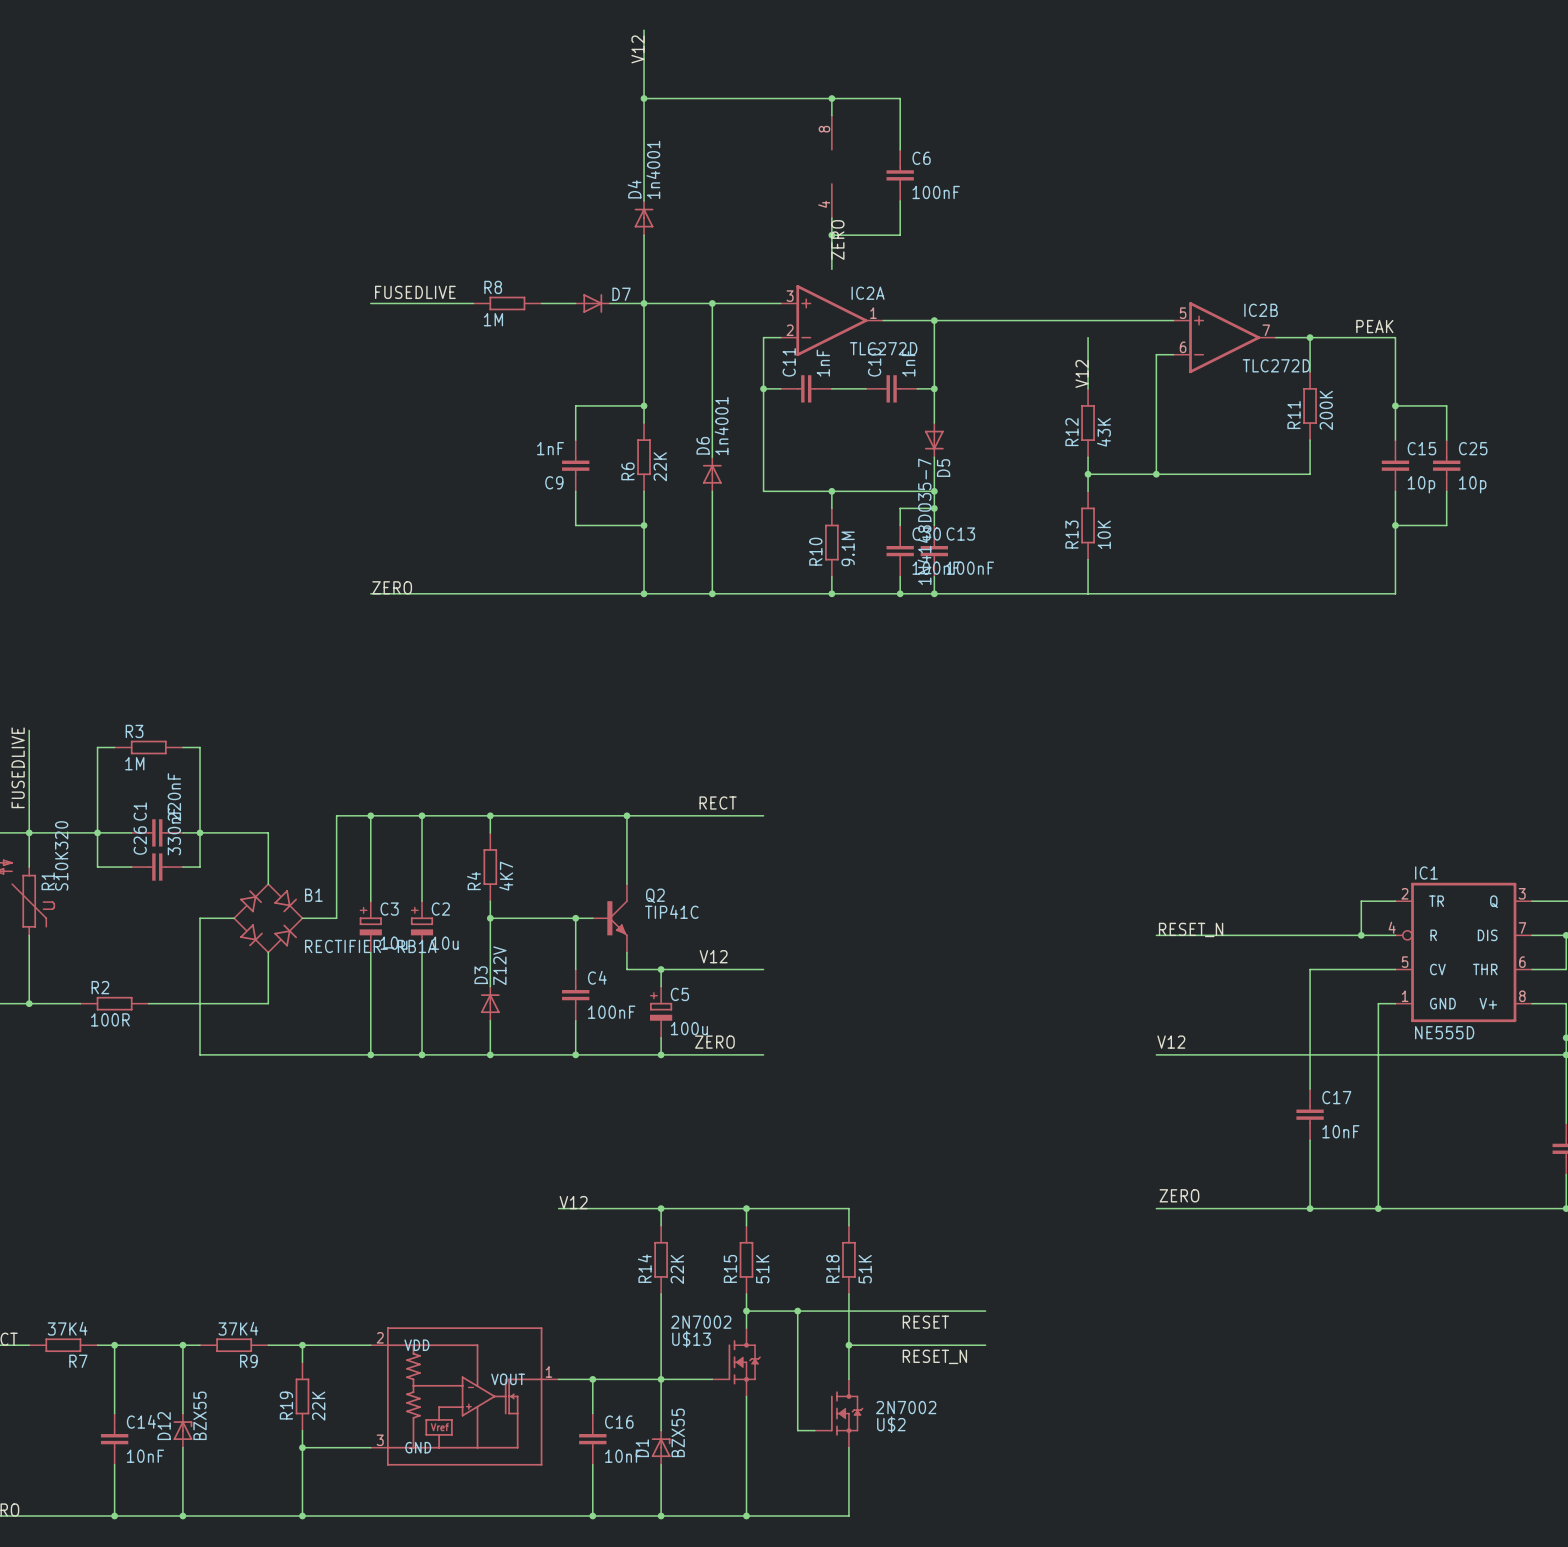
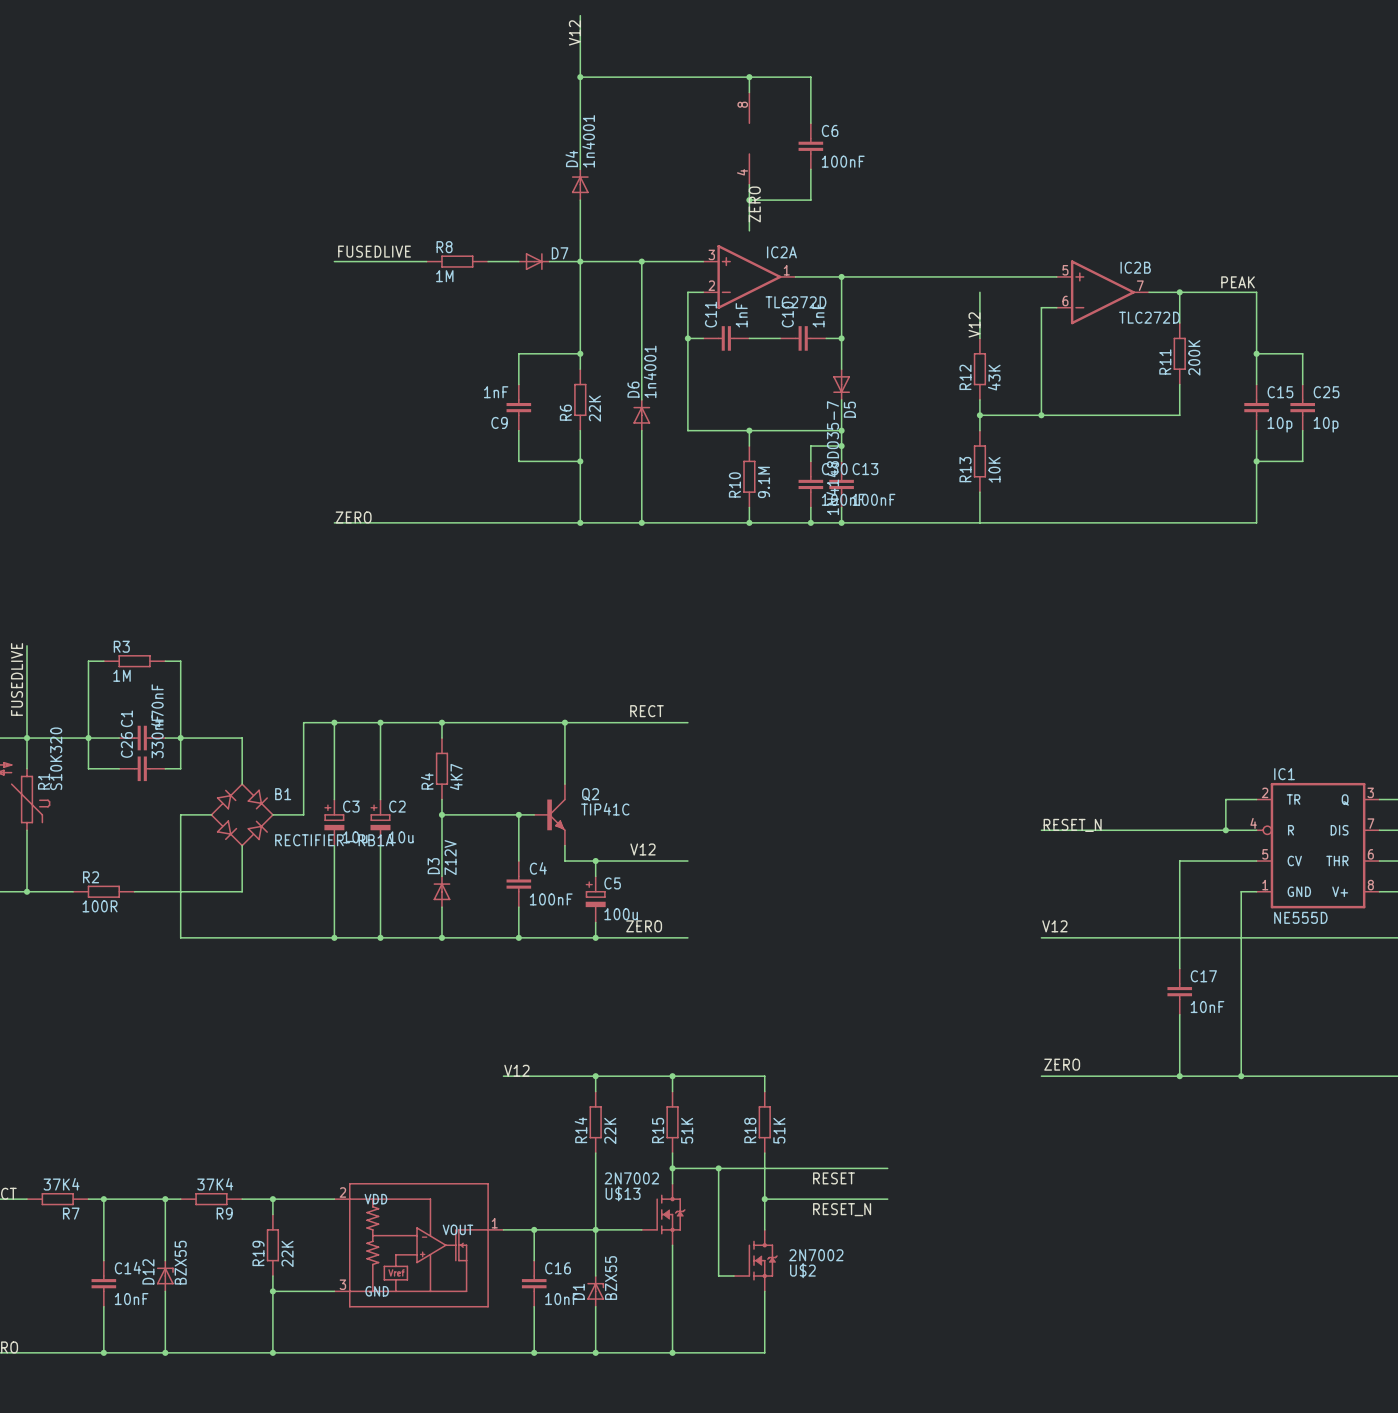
C1 value: 220nF (174, 797) -> 470nF (157, 705)

